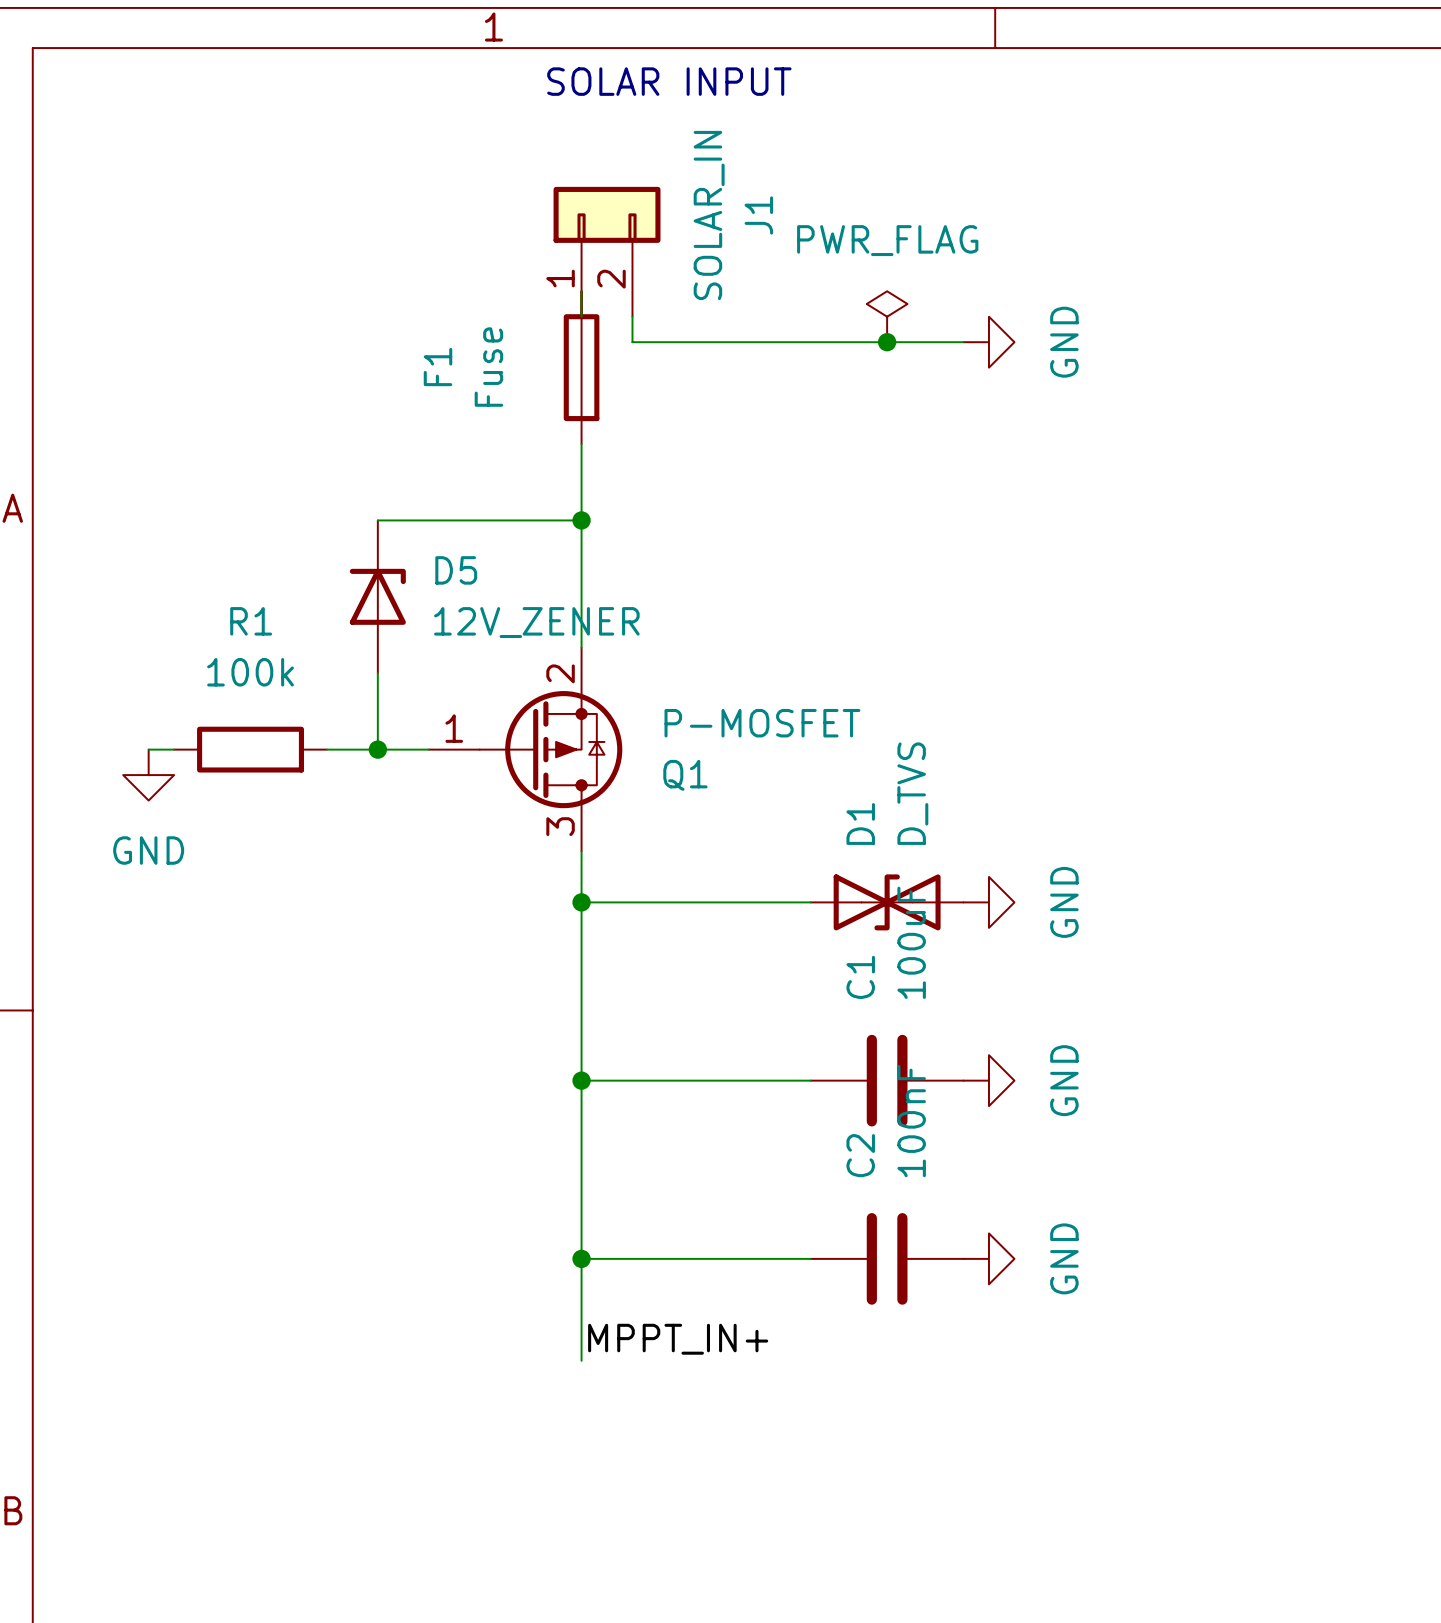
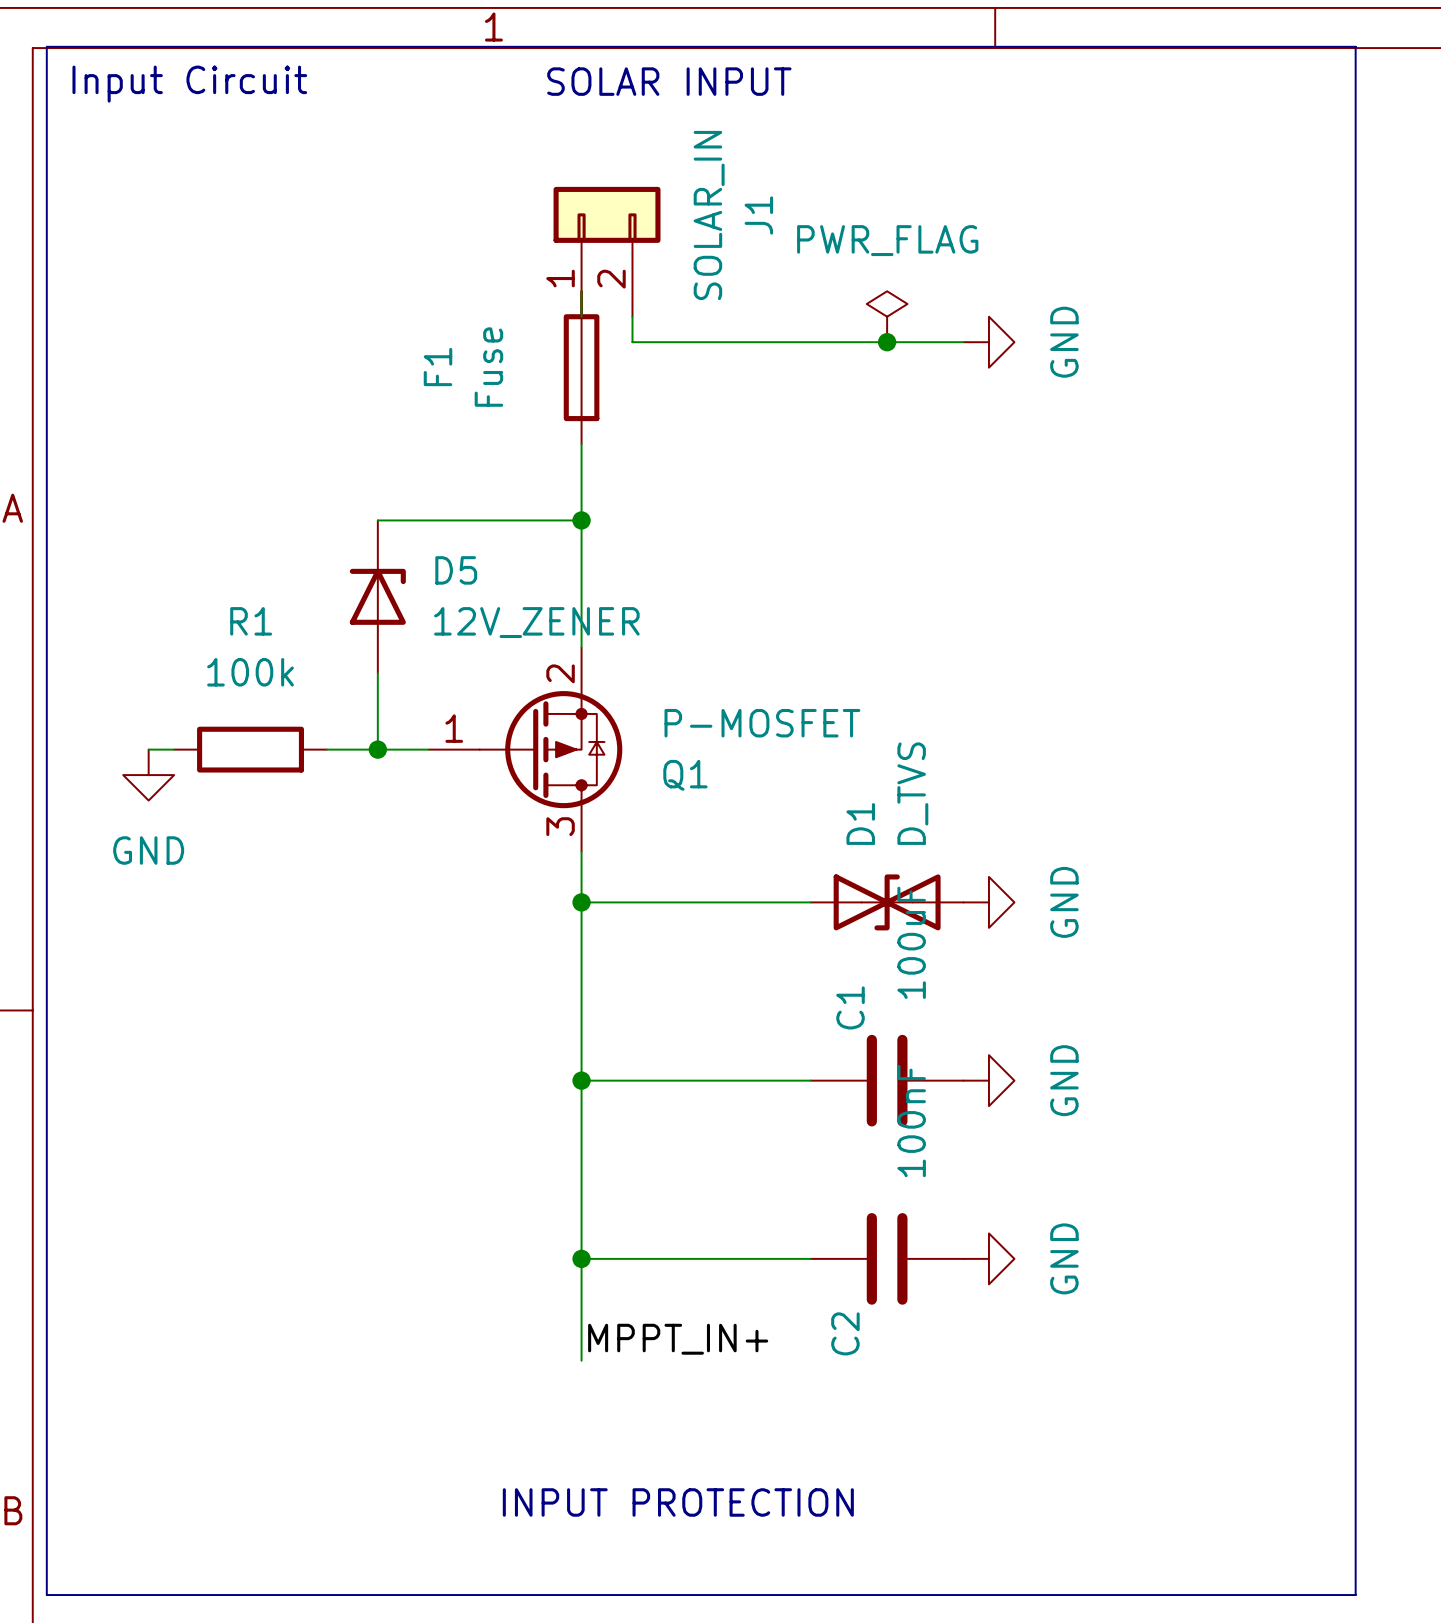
line: none -> (46, 46) (1355, 46) (1355, 1595) (46, 1595) (46, 46)
text: none -> Input Circuit (189, 84)
C1 name position: C1 (860, 977) -> C1 (850, 1007)
C2 name position: C2 (860, 1155) -> C2 (845, 1333)
text: none -> INPUT PROTECTION (678, 1502)

